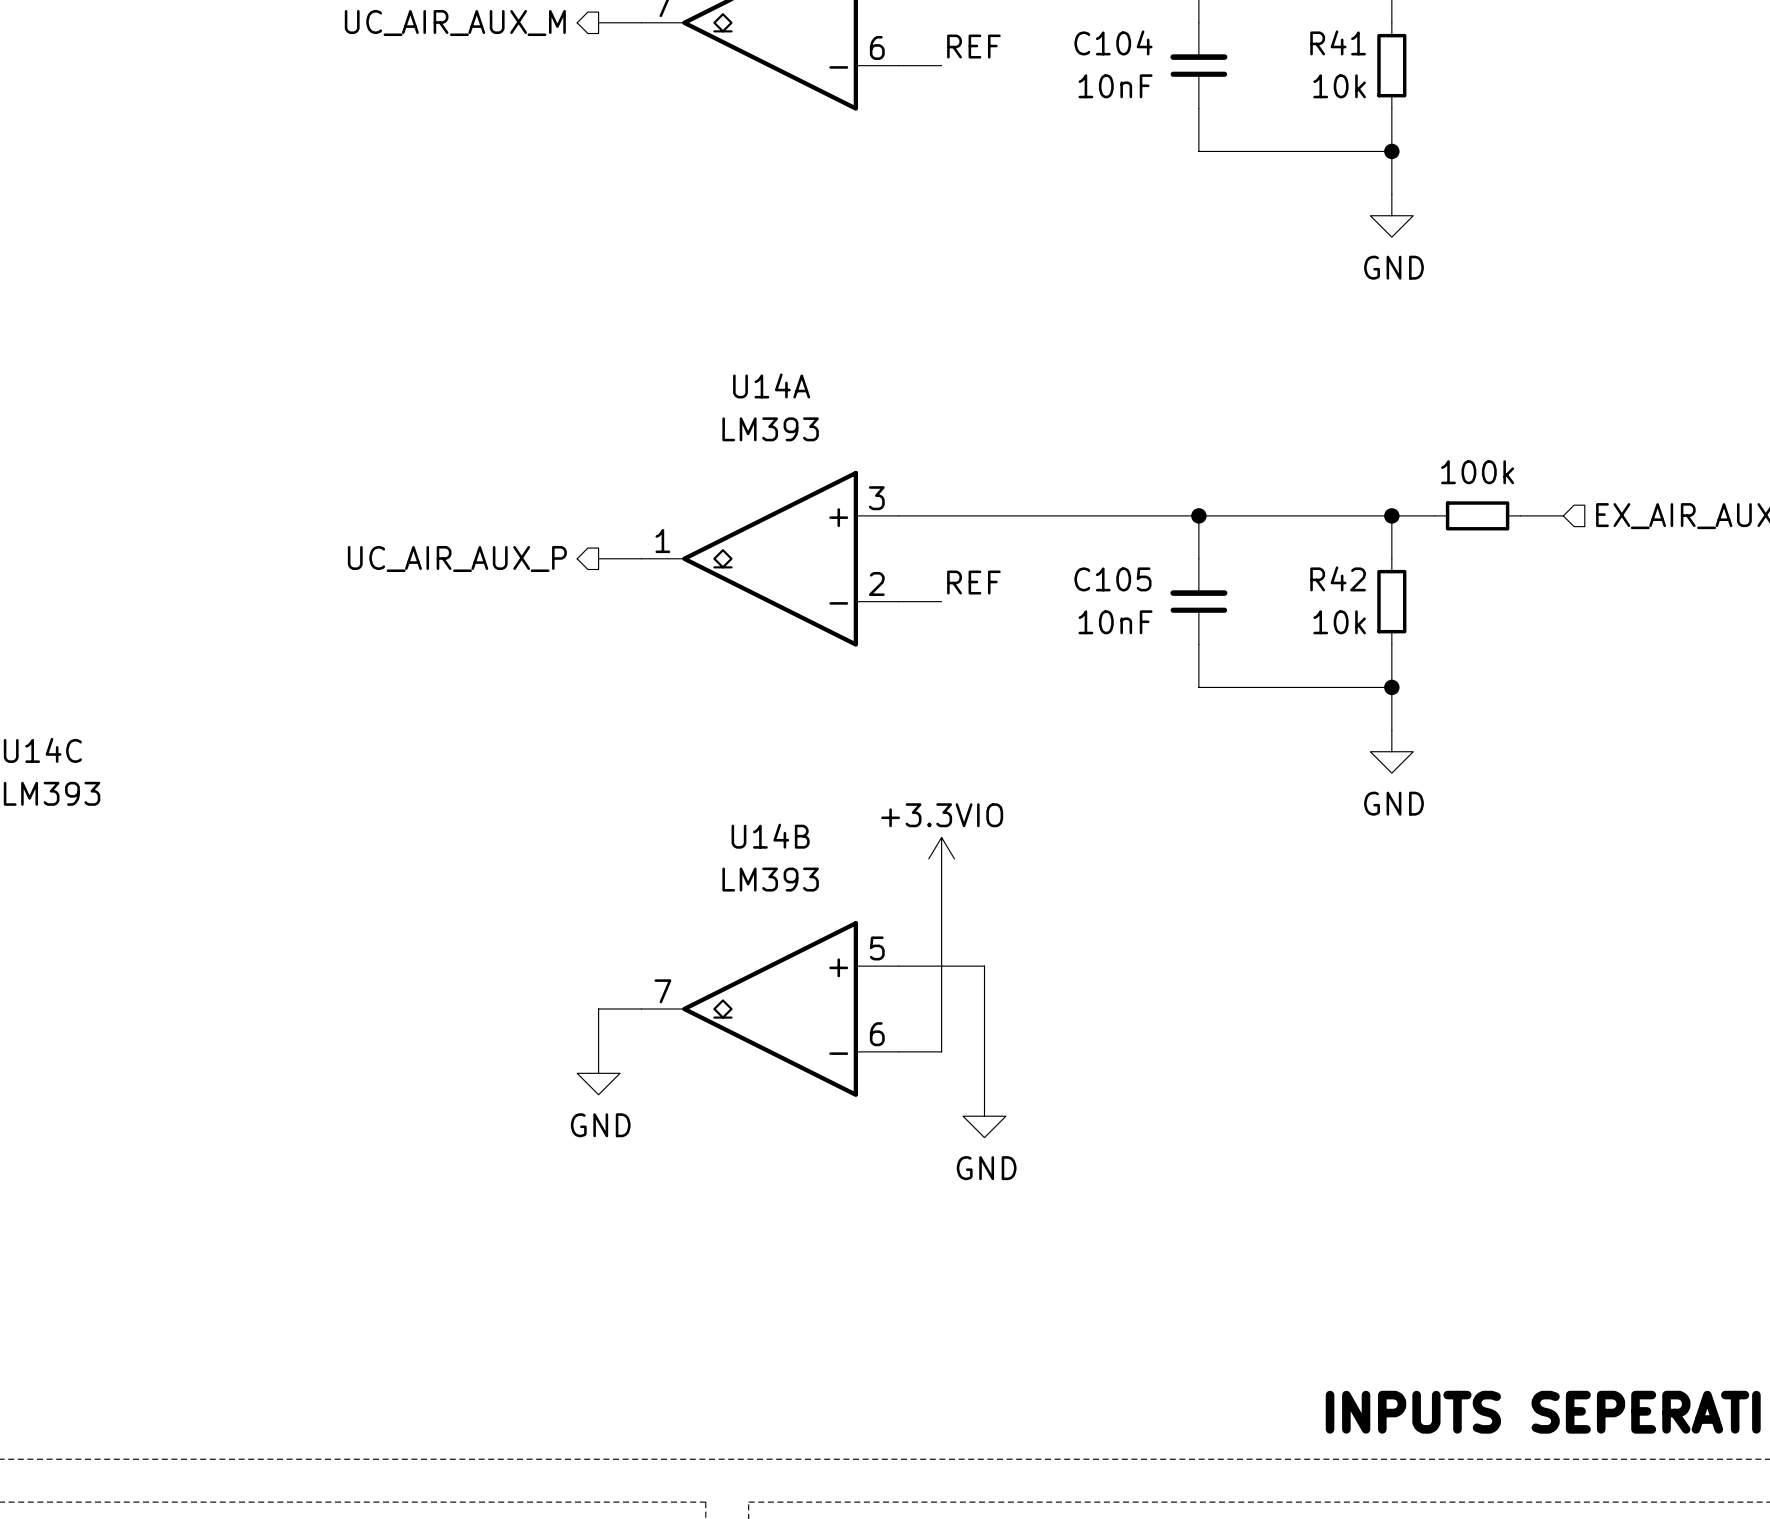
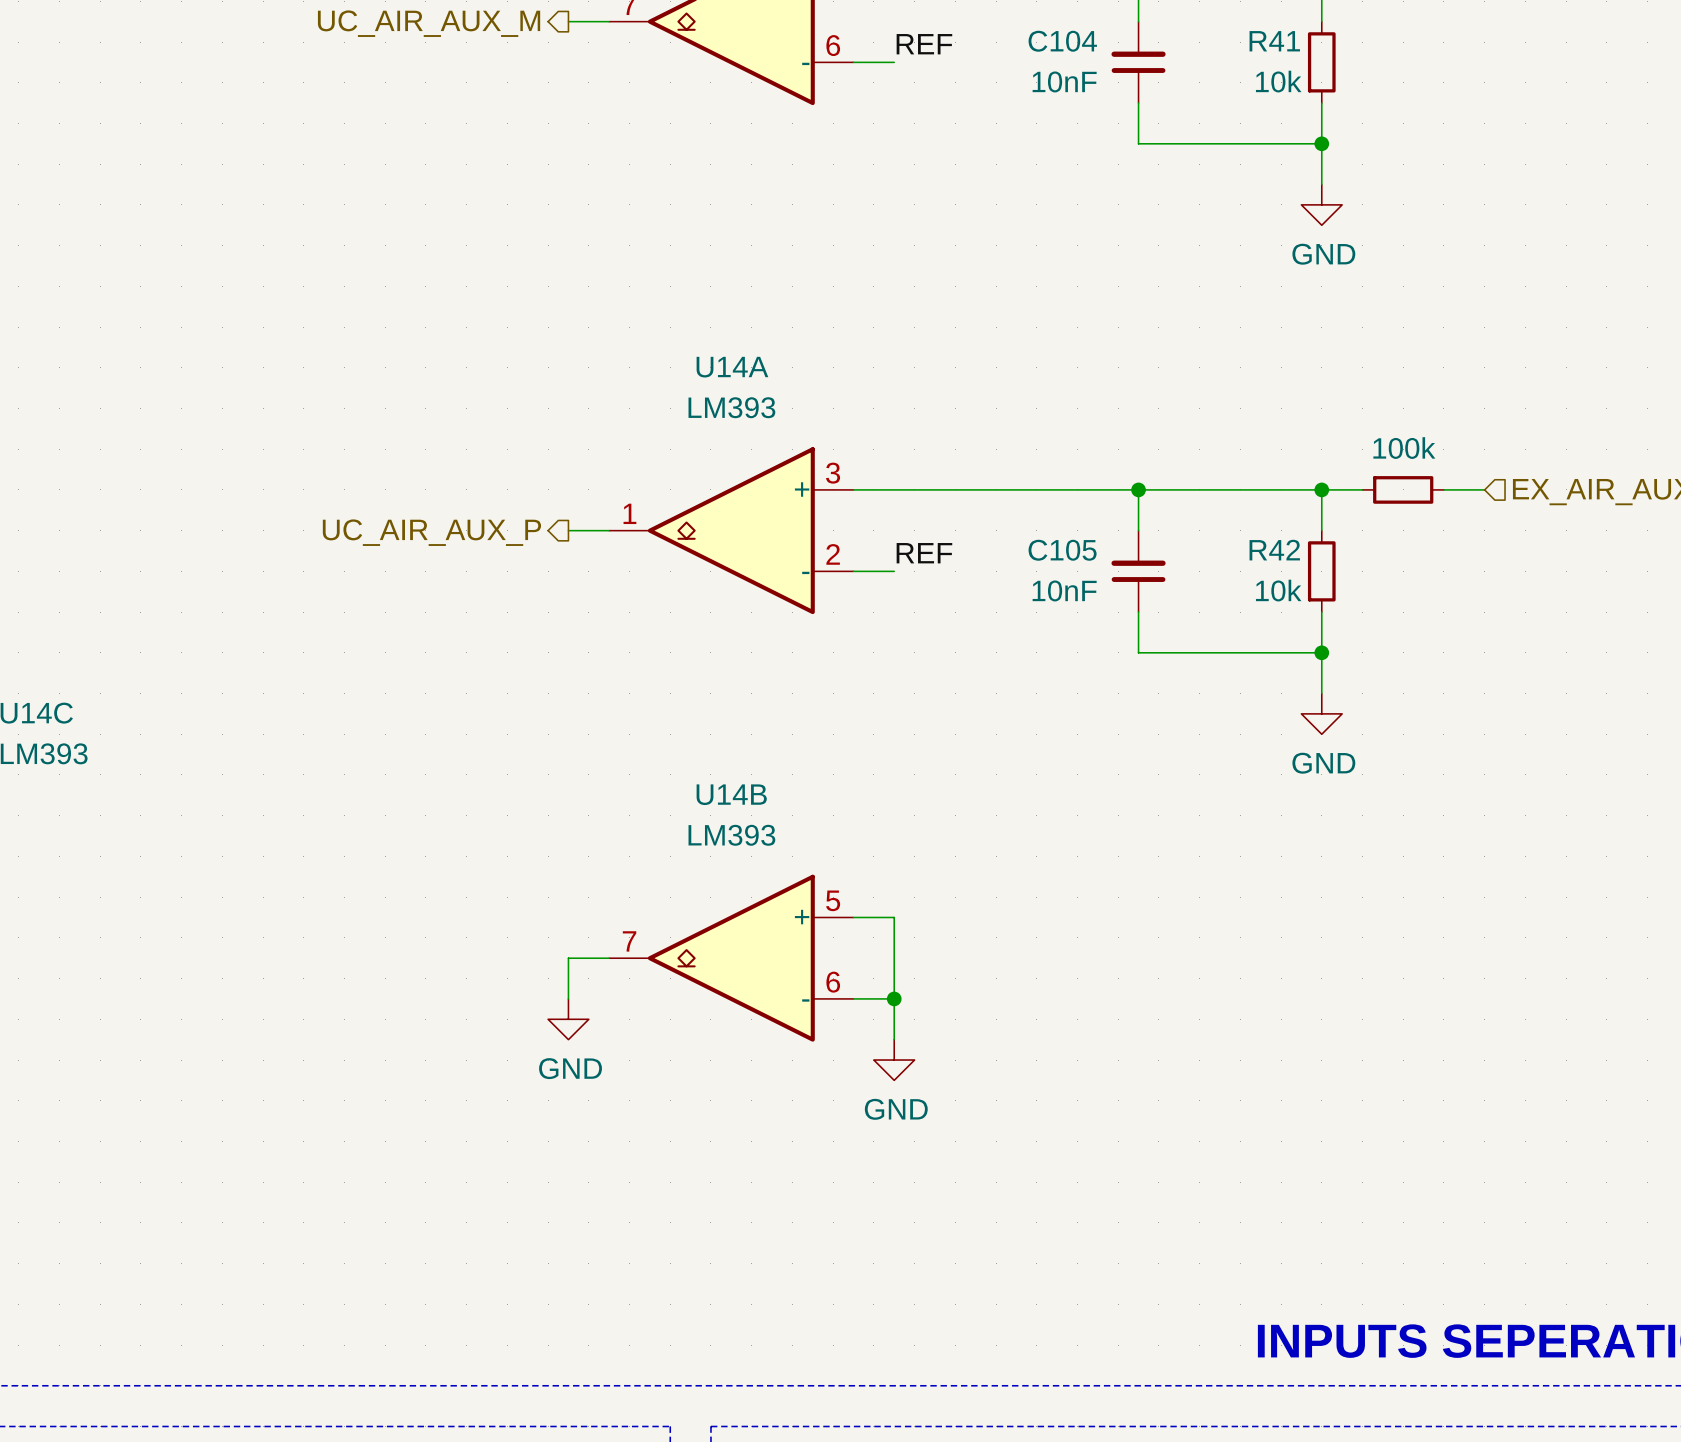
power symbol: +3.3VIO (941, 858) -> none
wire: (941, 880) (941, 966) (984, 966) (984, 1094) -> none
wire: none -> (894, 998) (894, 1039)
junction: none -> (894, 998)
power symbol position: GND (984, 1116) -> GND (894, 1060)

